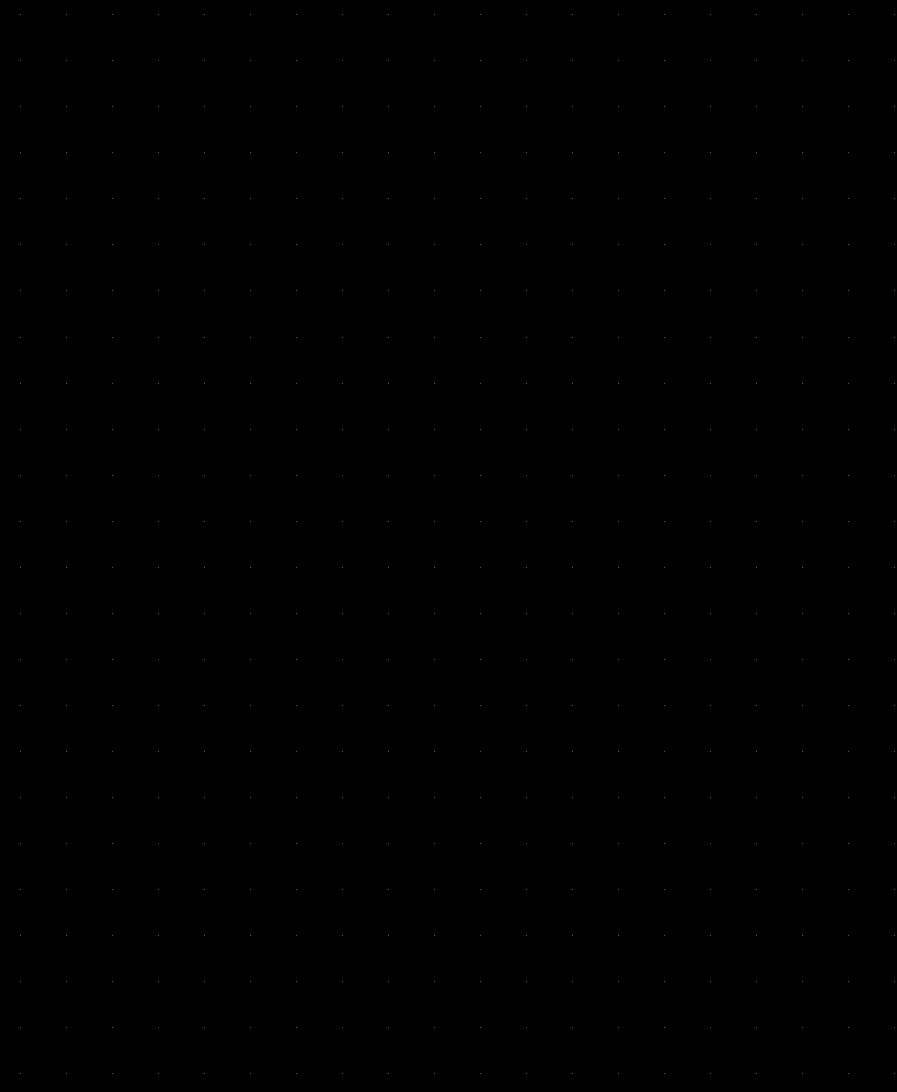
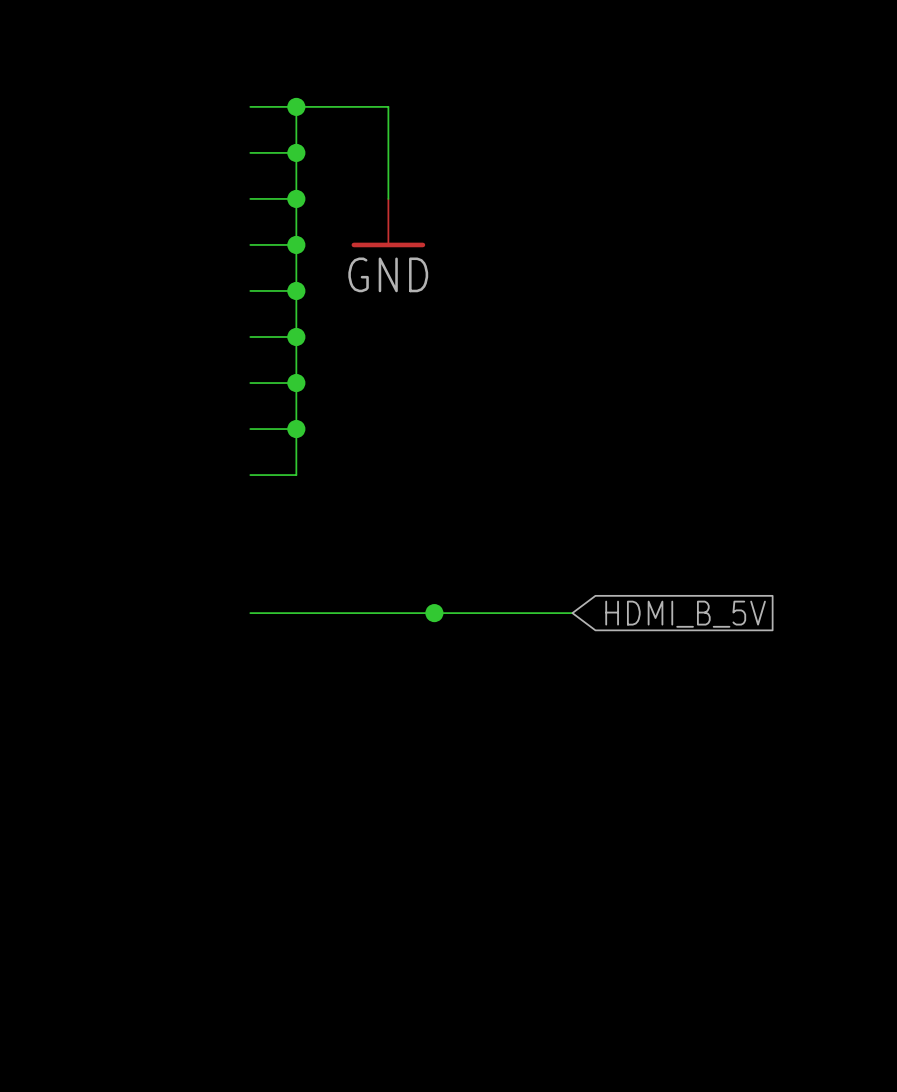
wire: none -> (250, 106) (388, 106) (388, 198)
wire: none -> (296, 106) (296, 475) (250, 475)
junction: none -> (296, 106)
wire: none -> (250, 152) (296, 152)
junction: none -> (296, 152)
wire: none -> (250, 198) (296, 198)
junction: none -> (296, 198)
power symbol: none -> GND (388, 223)
wire: none -> (250, 244) (296, 244)
junction: none -> (296, 244)
wire: none -> (250, 290) (296, 290)
junction: none -> (296, 290)
wire: none -> (250, 337) (296, 337)
junction: none -> (296, 337)
wire: none -> (250, 383) (296, 383)
junction: none -> (296, 383)
wire: none -> (250, 429) (296, 429)
junction: none -> (296, 429)
wire: none -> (250, 613) (572, 613)
junction: none -> (434, 613)
global label: none -> HDMI_B_5V (685, 614)

